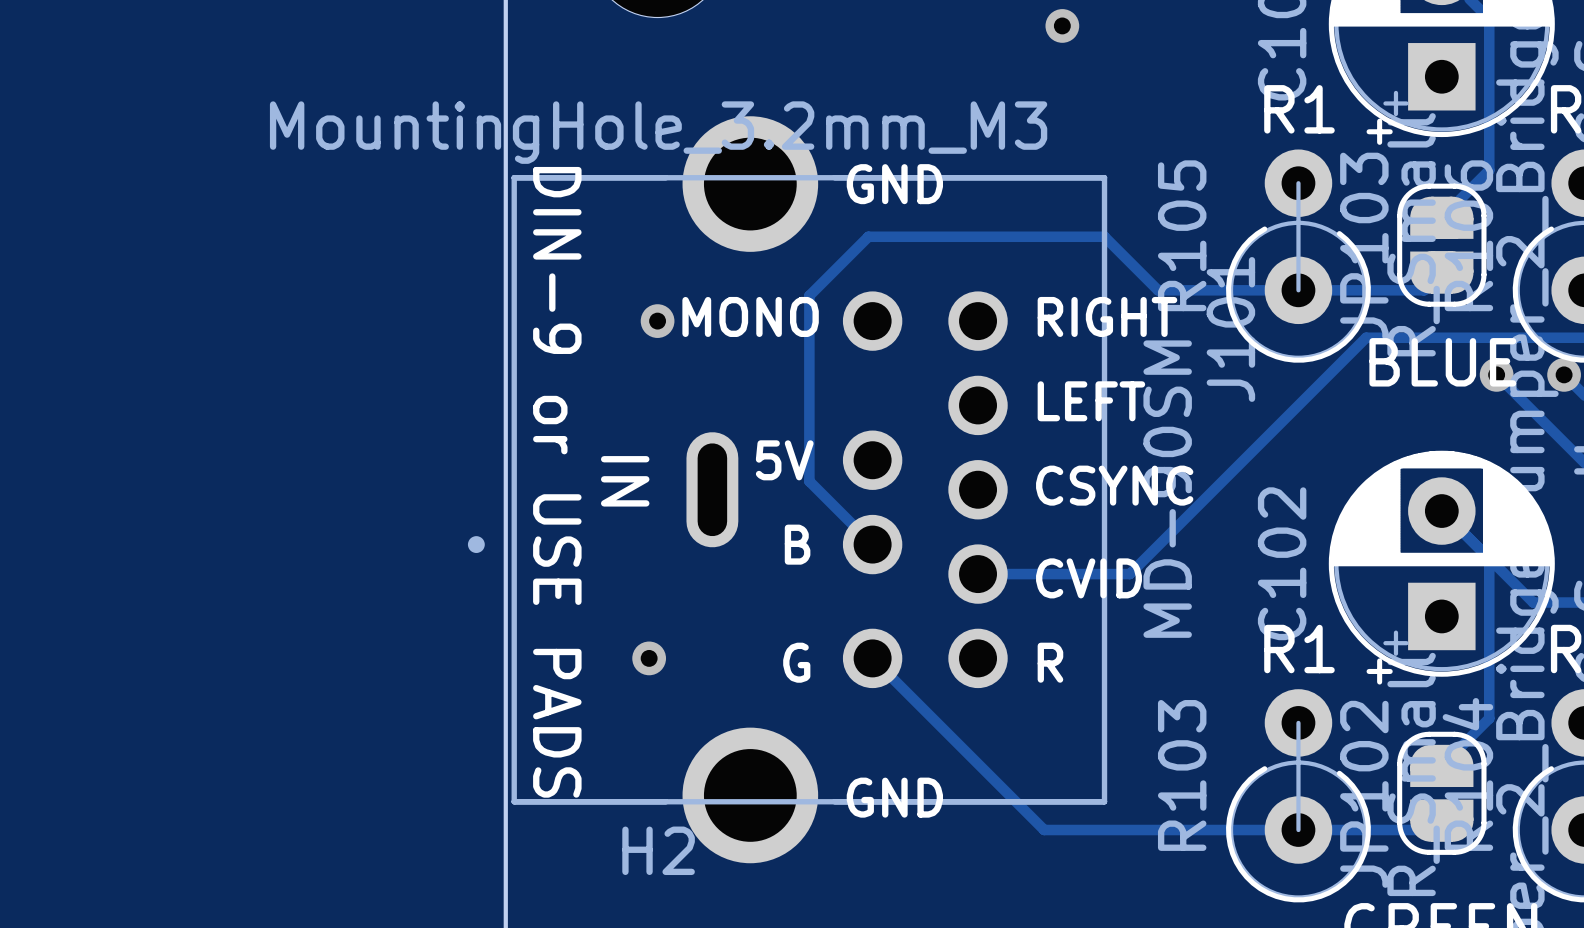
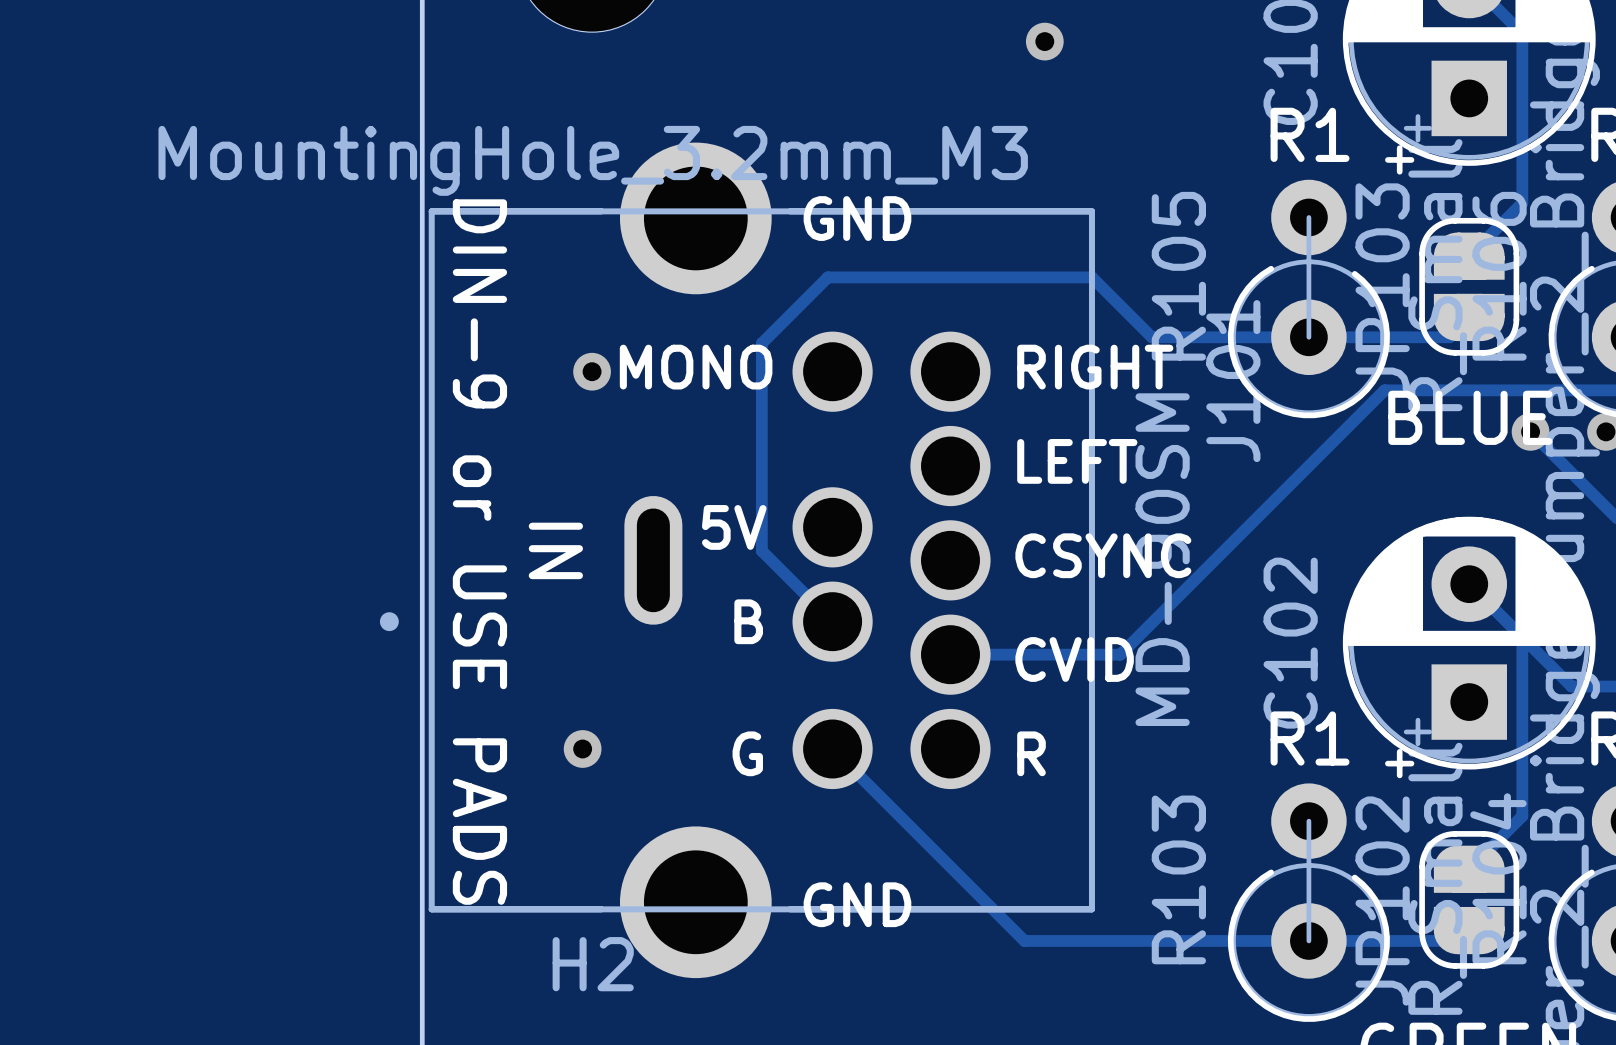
J101 footprint: [467, 116, 1108, 864] -> [379, 142, 1095, 979]

